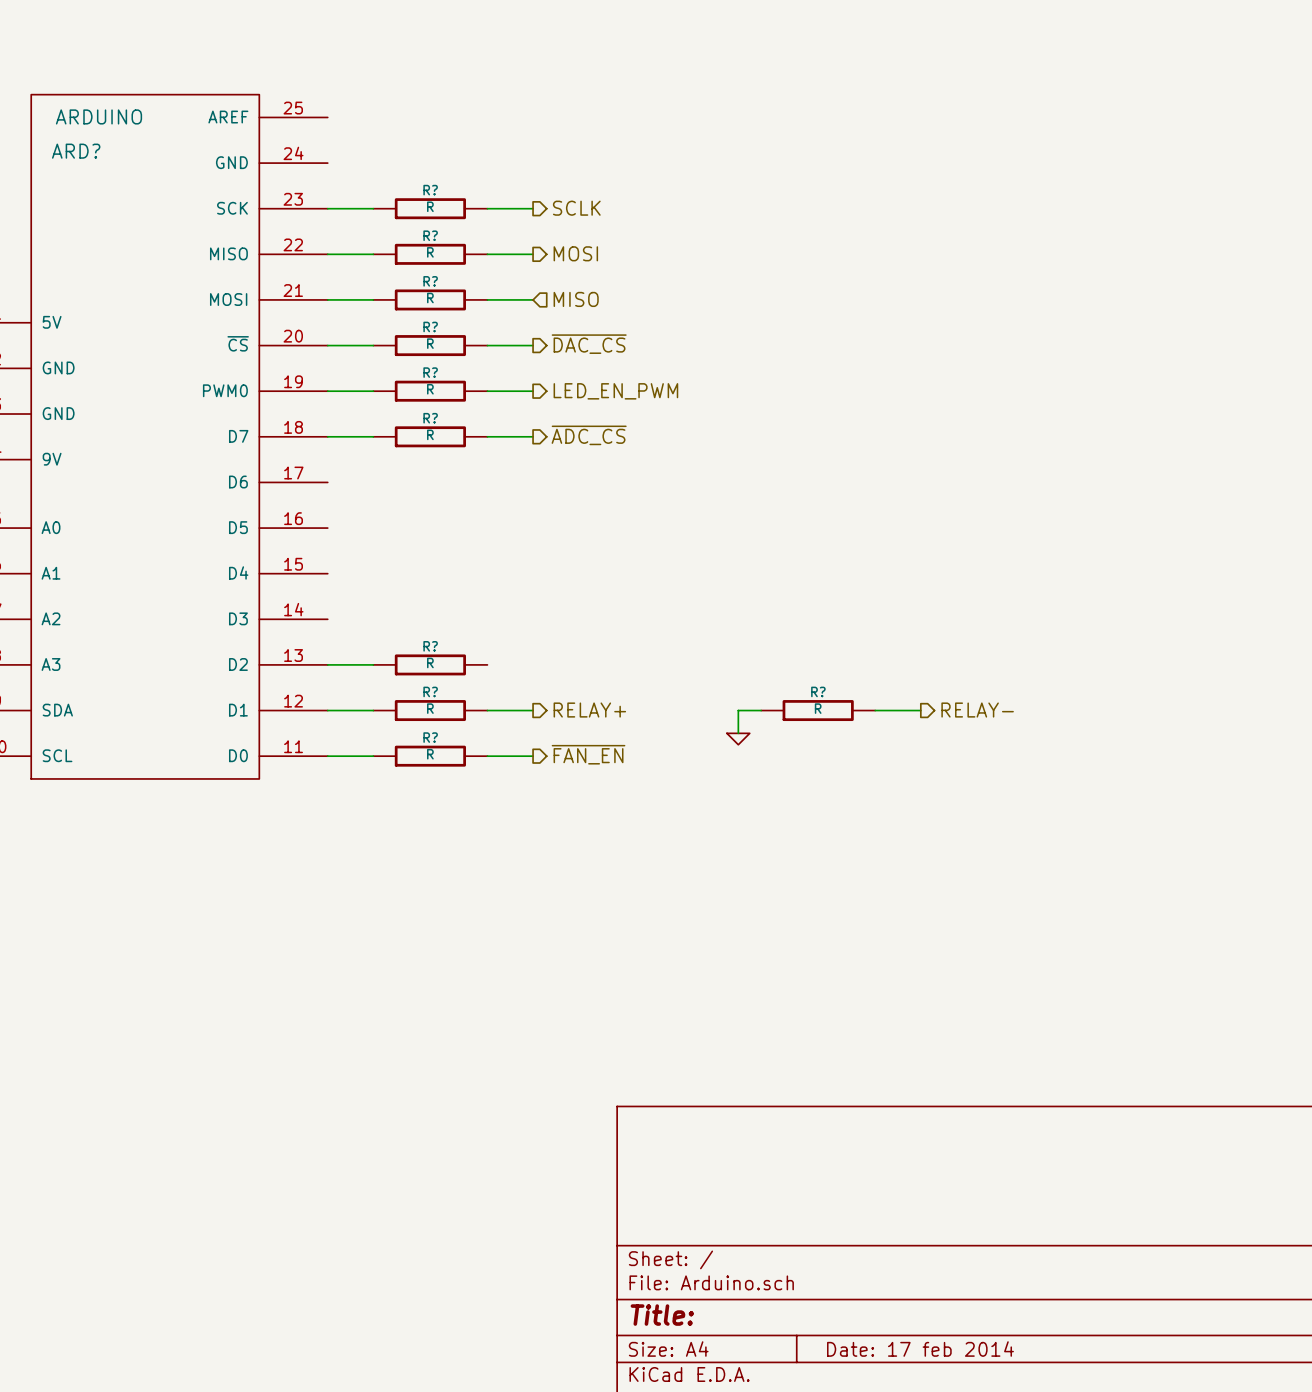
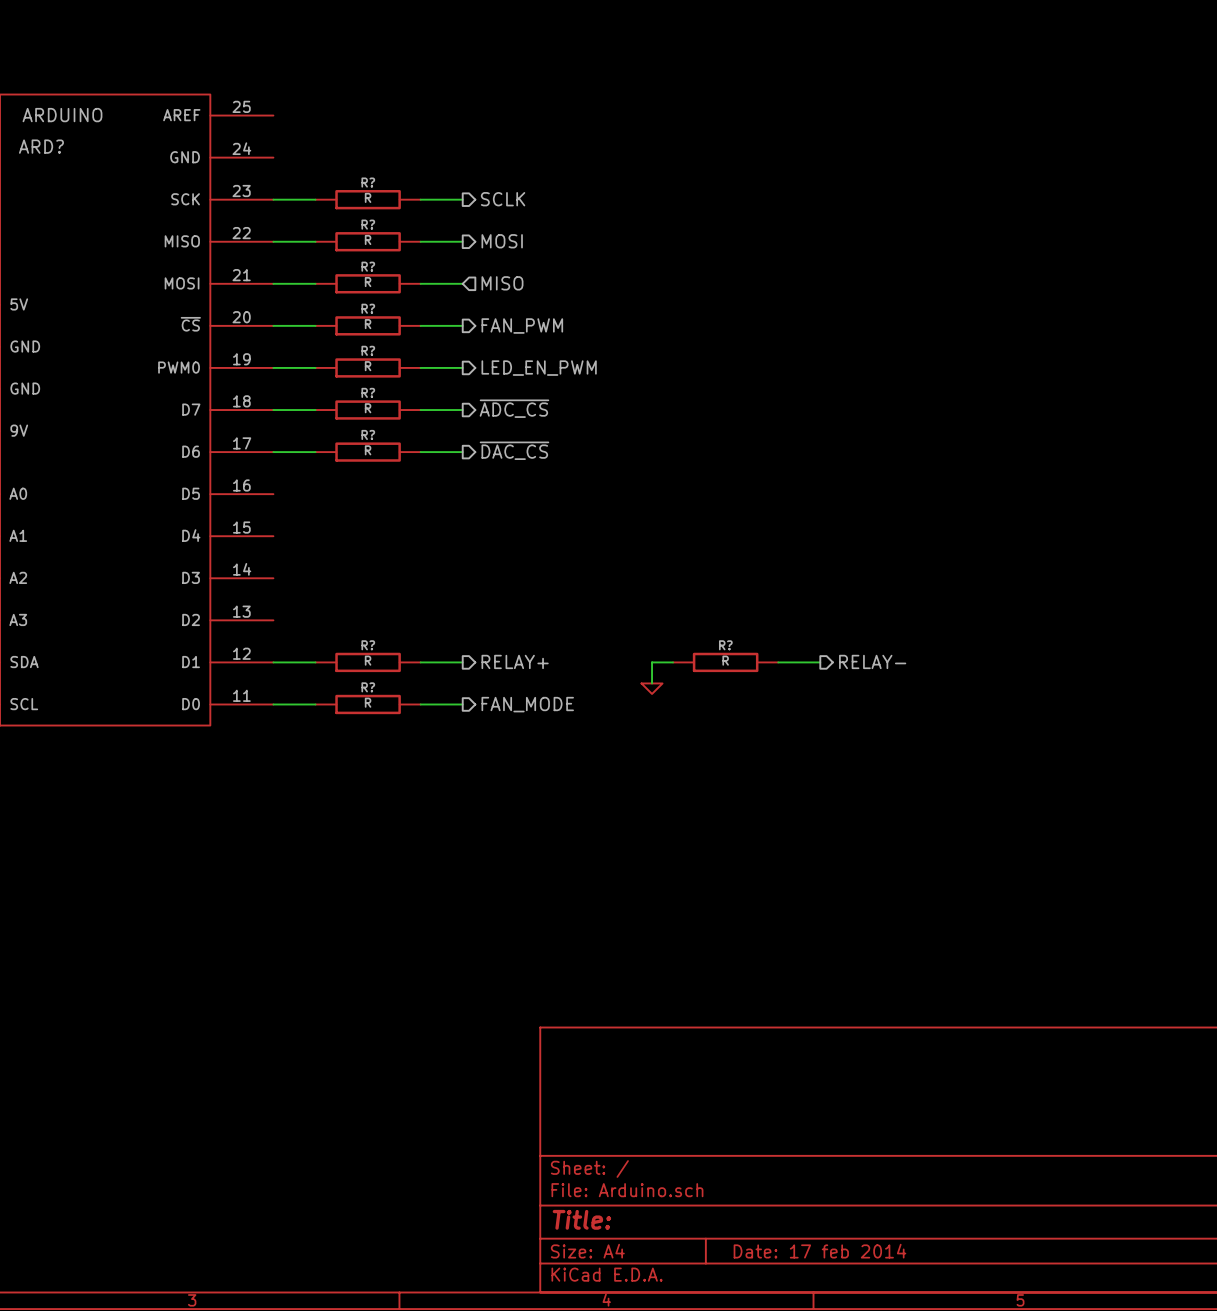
hierarchical label: ~{DAC_CS} (589, 344) -> FAN_PWM (522, 326)
hierarchical label: none -> ~{DAC_CS} (514, 450)
wire: none -> (420, 452) (462, 452)
wire: (327, 664) (373, 664) -> (273, 452) (315, 452)
R? position: (430, 664) -> (368, 452)
hierarchical label: ~{FAN_EN} (588, 754) -> FAN_MODE (527, 704)

